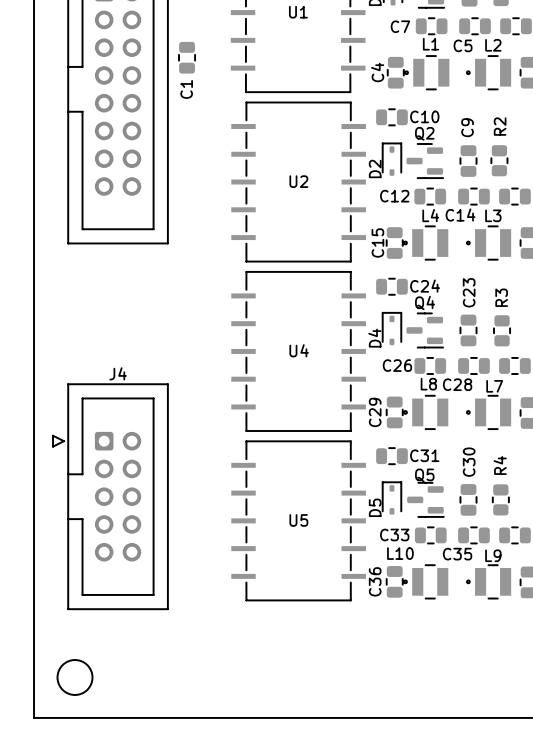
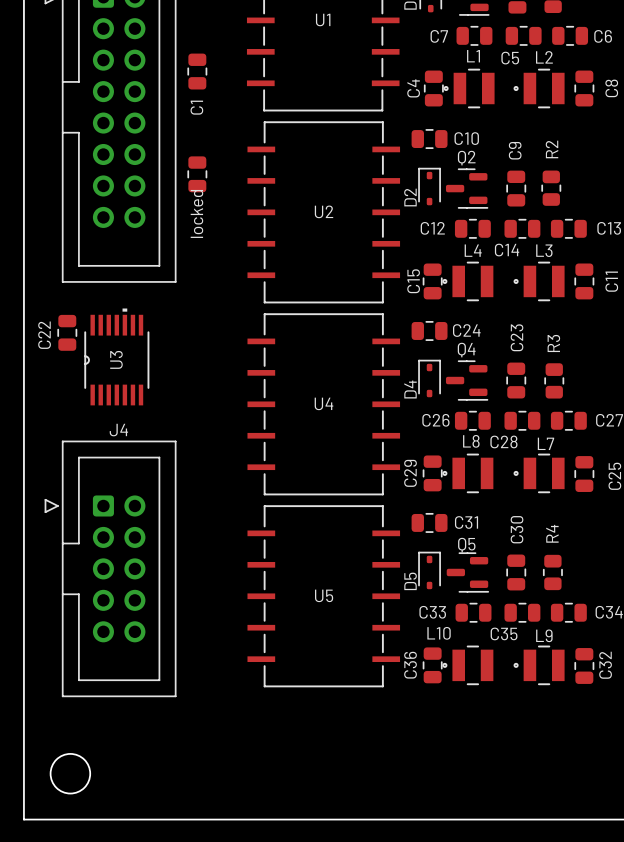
locked: none -> (197, 174)
C22: none -> (67, 332)
U3: none -> (116, 356)

